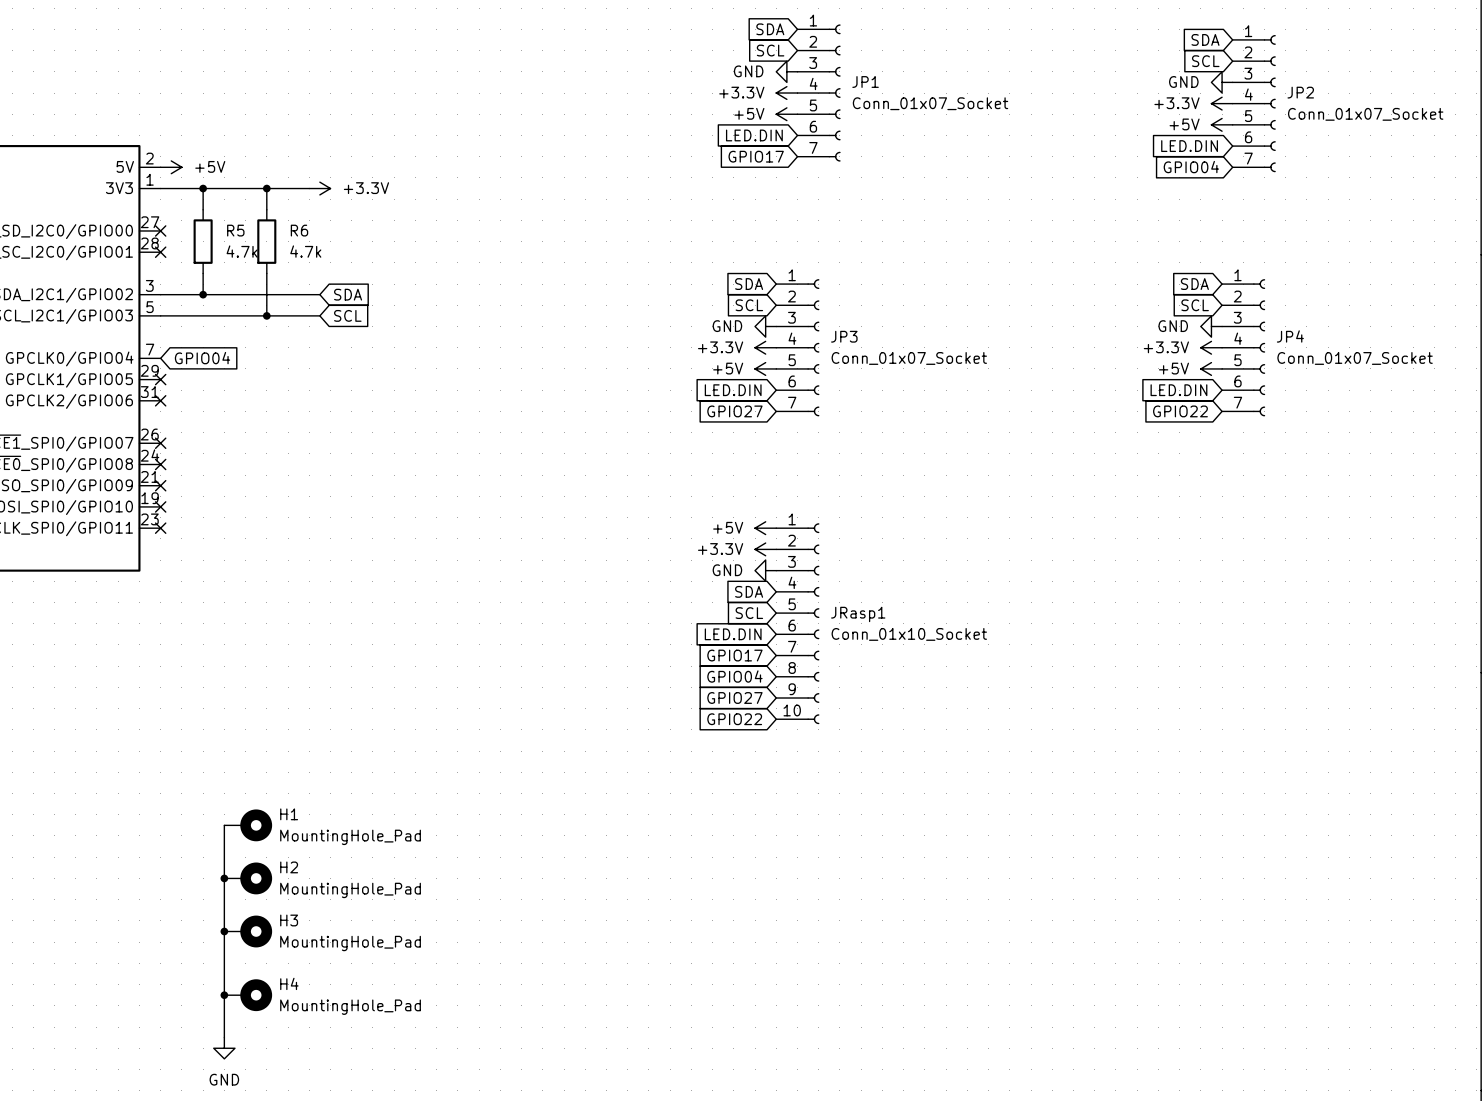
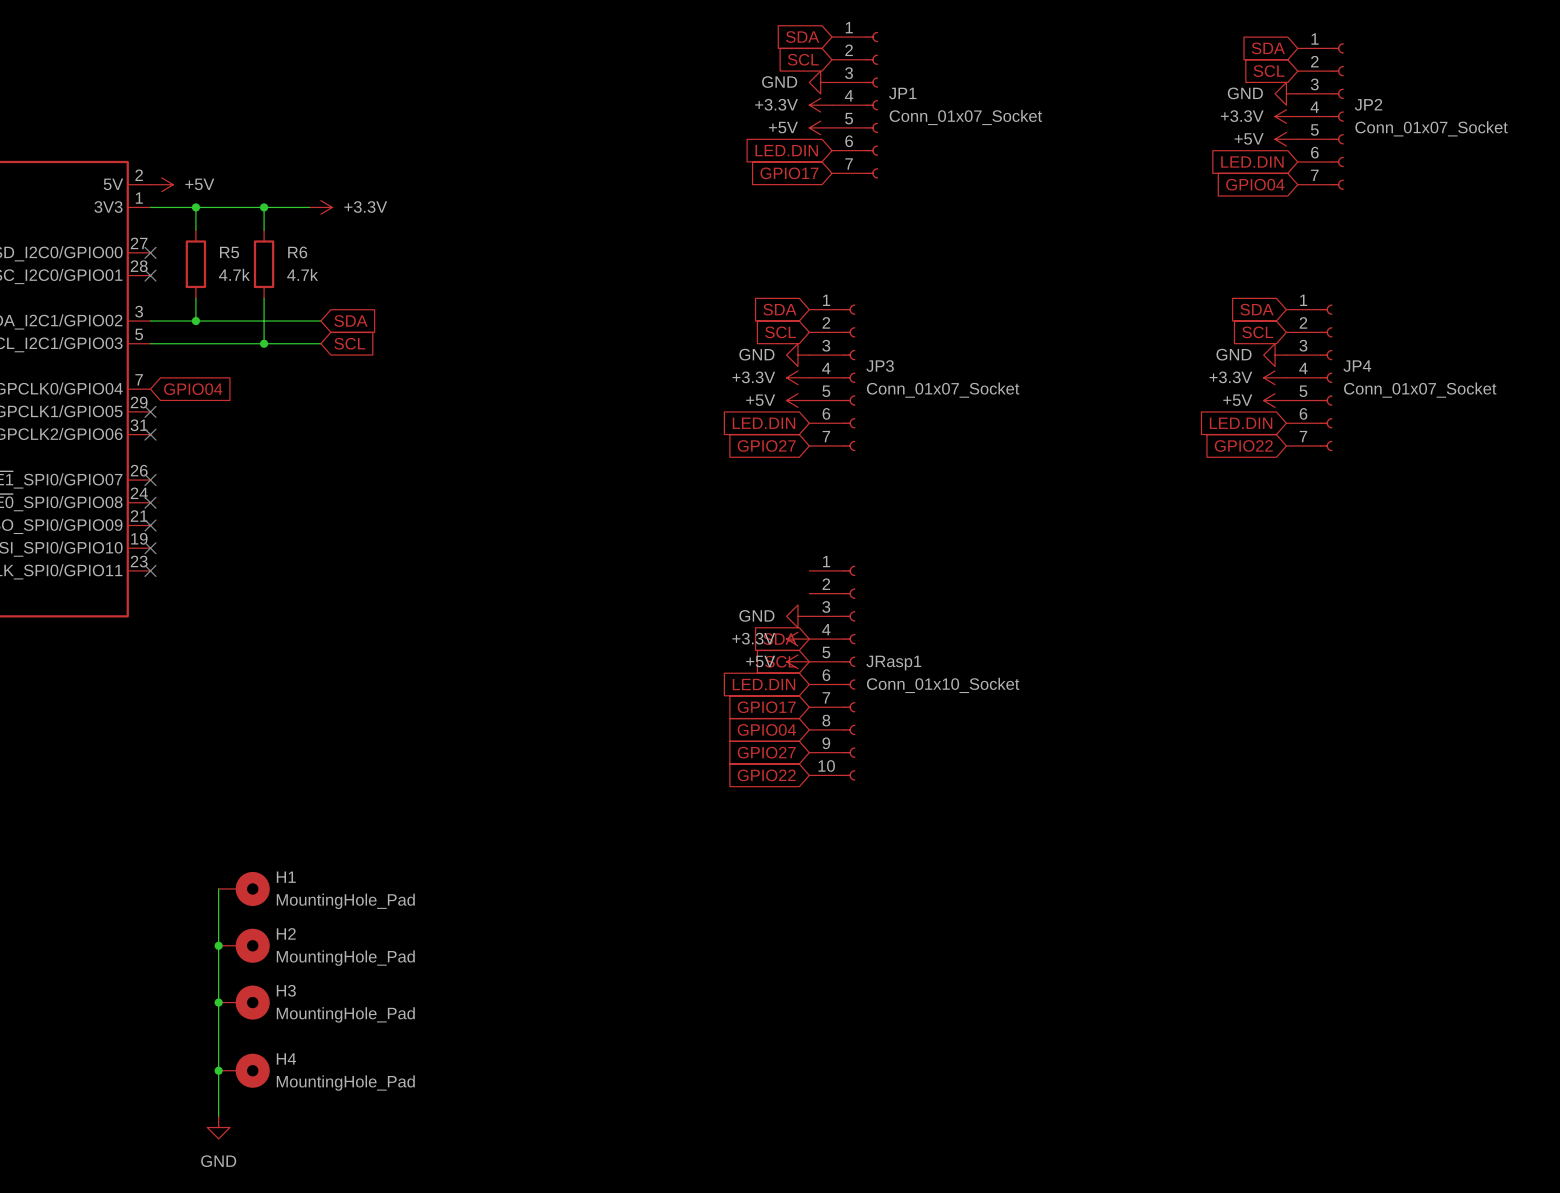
power symbol position: +5V (765, 528) -> +5V (797, 661)
power symbol position: +3.3V (765, 549) -> +3.3V (797, 639)

